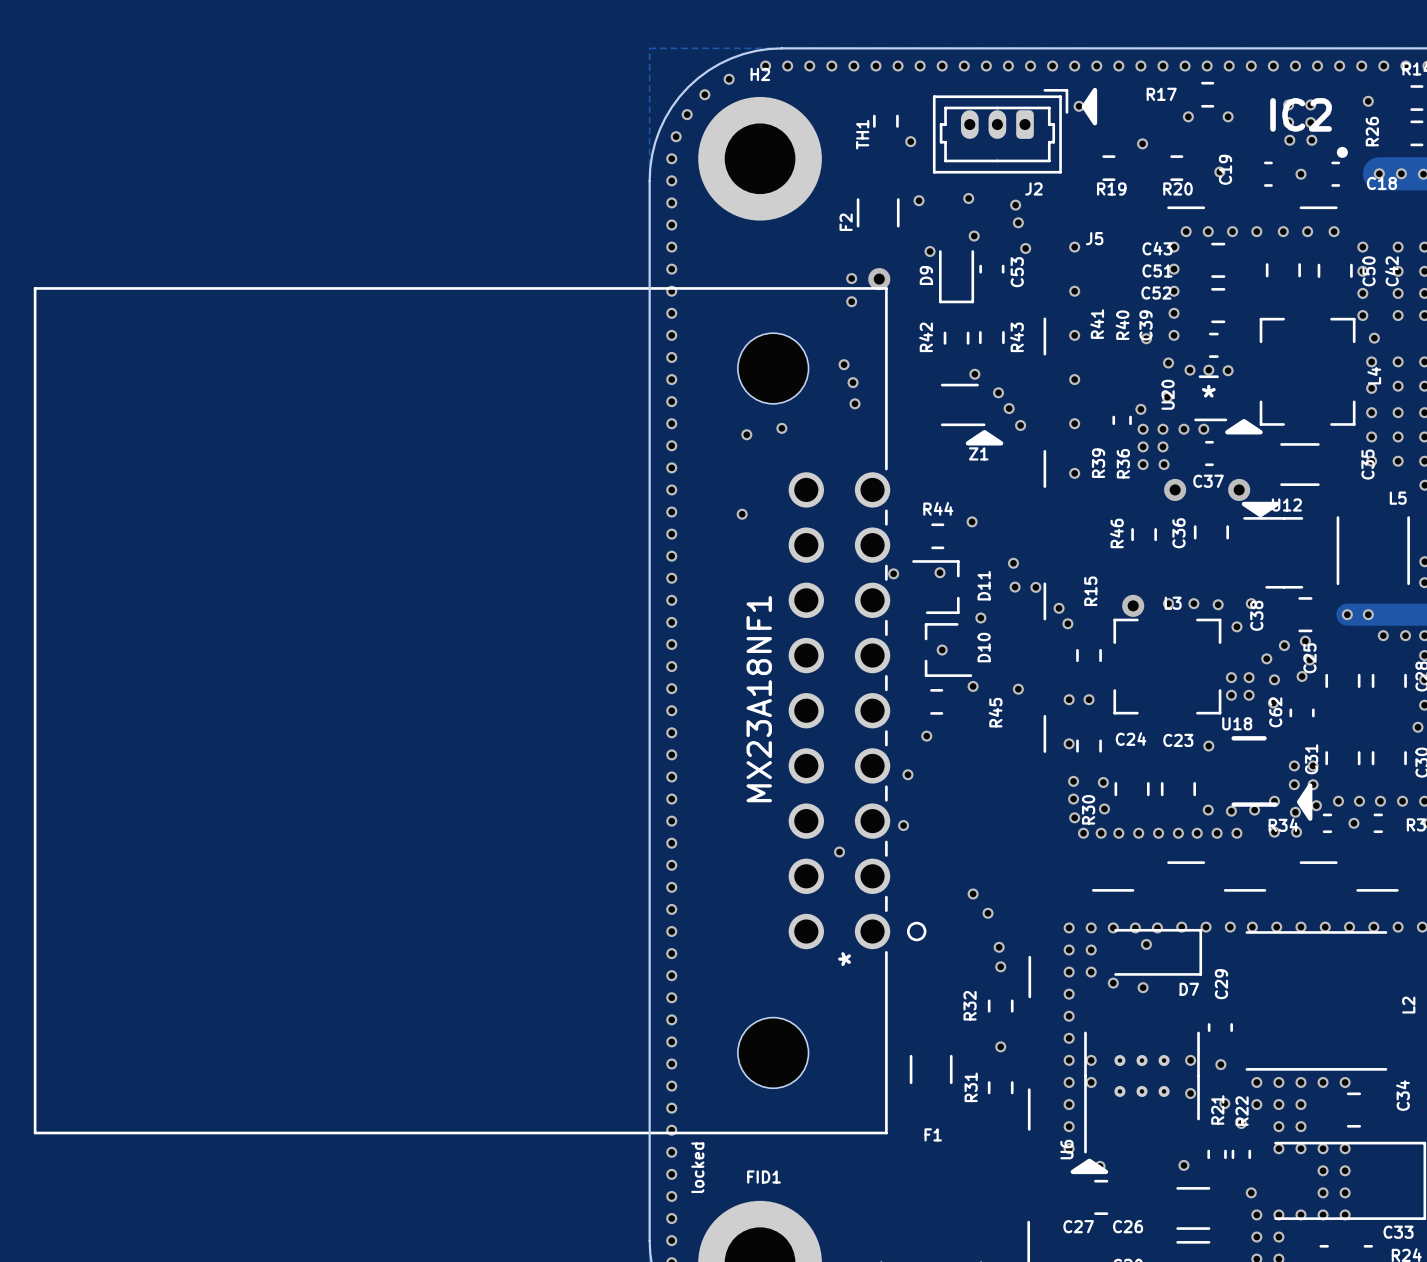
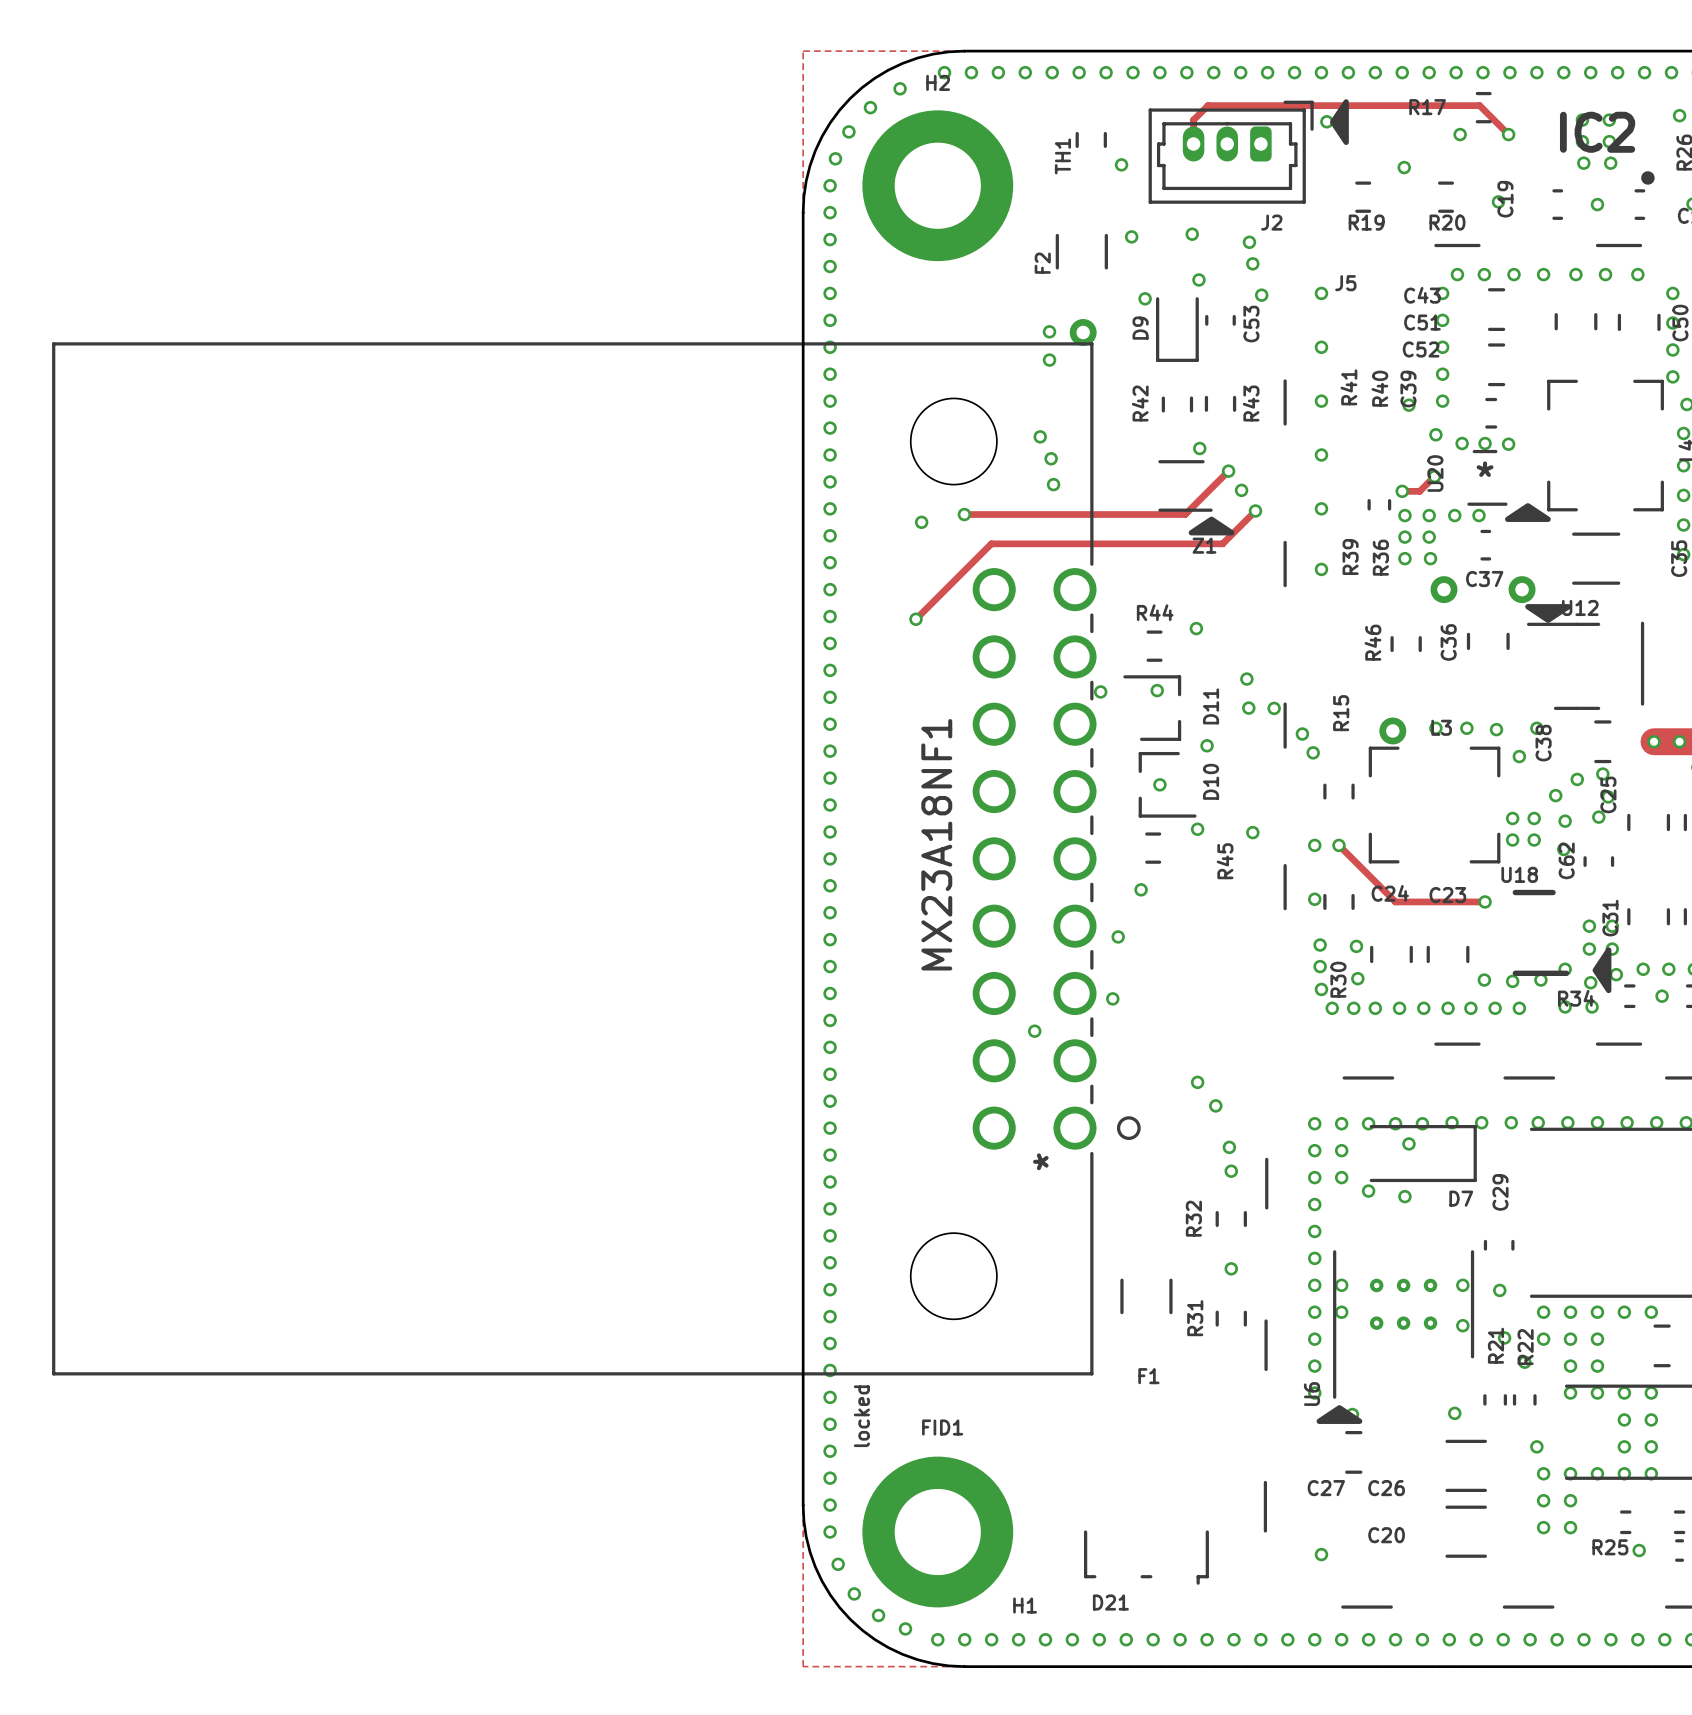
track: none -> (1508, 134) (1479, 105) (1207, 105) (1193, 120) (1193, 144)
track: none -> (1228, 471) (1185, 514) (964, 514)
track: none -> (1434, 476) (1419, 491) (1402, 491)
track: none -> (1255, 510) (1222, 543) (991, 543) (916, 619)
track: none -> (1338, 845) (1395, 901) (1485, 901)

